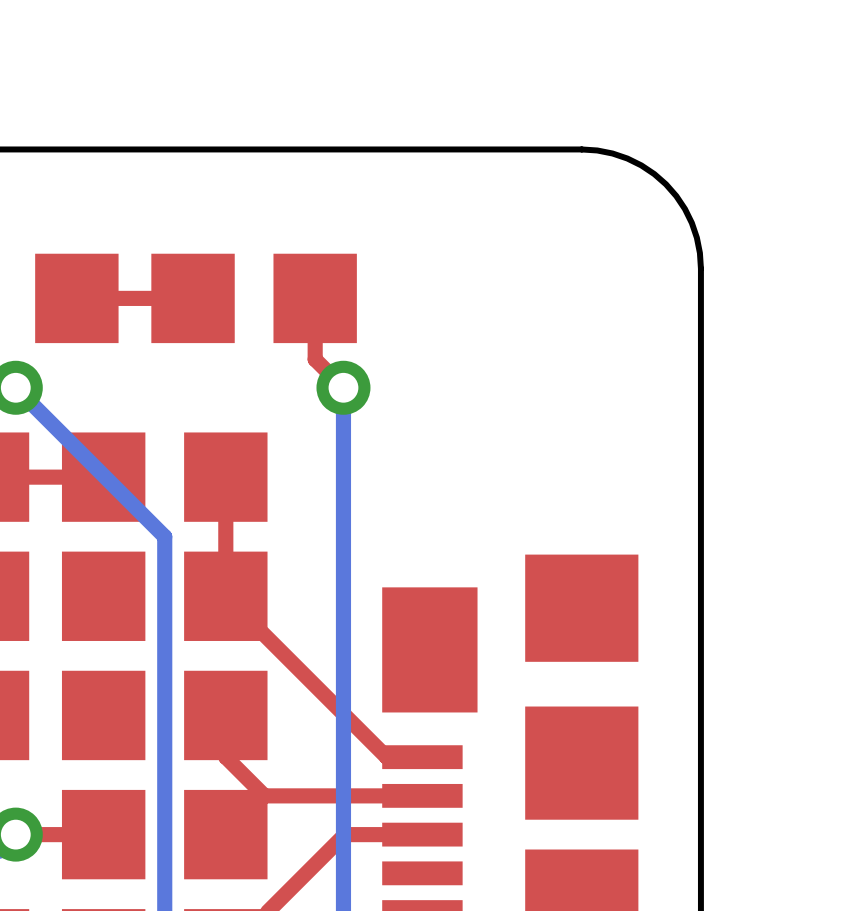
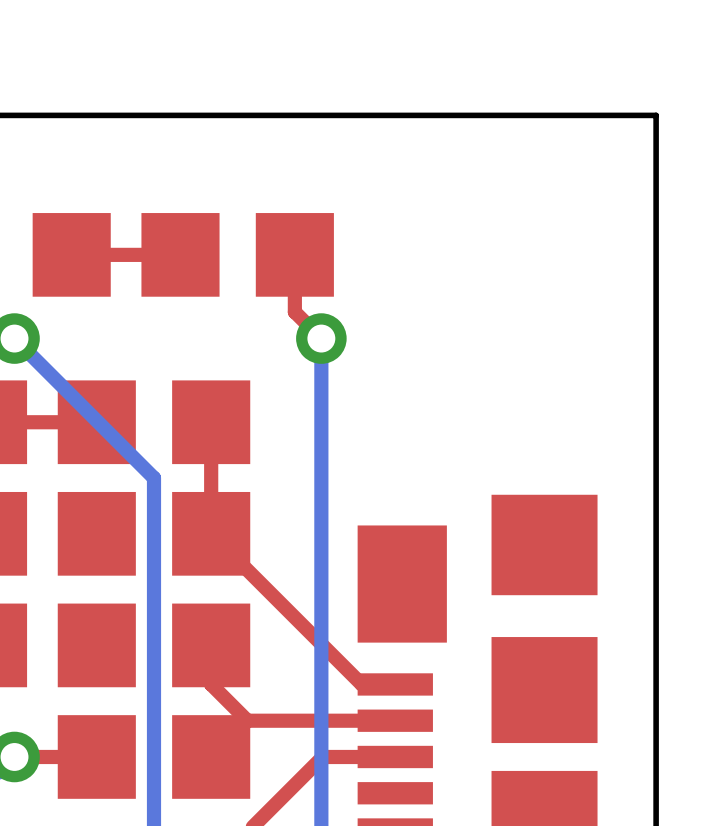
board edge: (581, 149) (612, 153) (627, 158) (641, 165) (666, 184) (684, 209) (691, 223) (696, 237) (700, 268) -> (544, 115) (656, 115) (656, 226)

